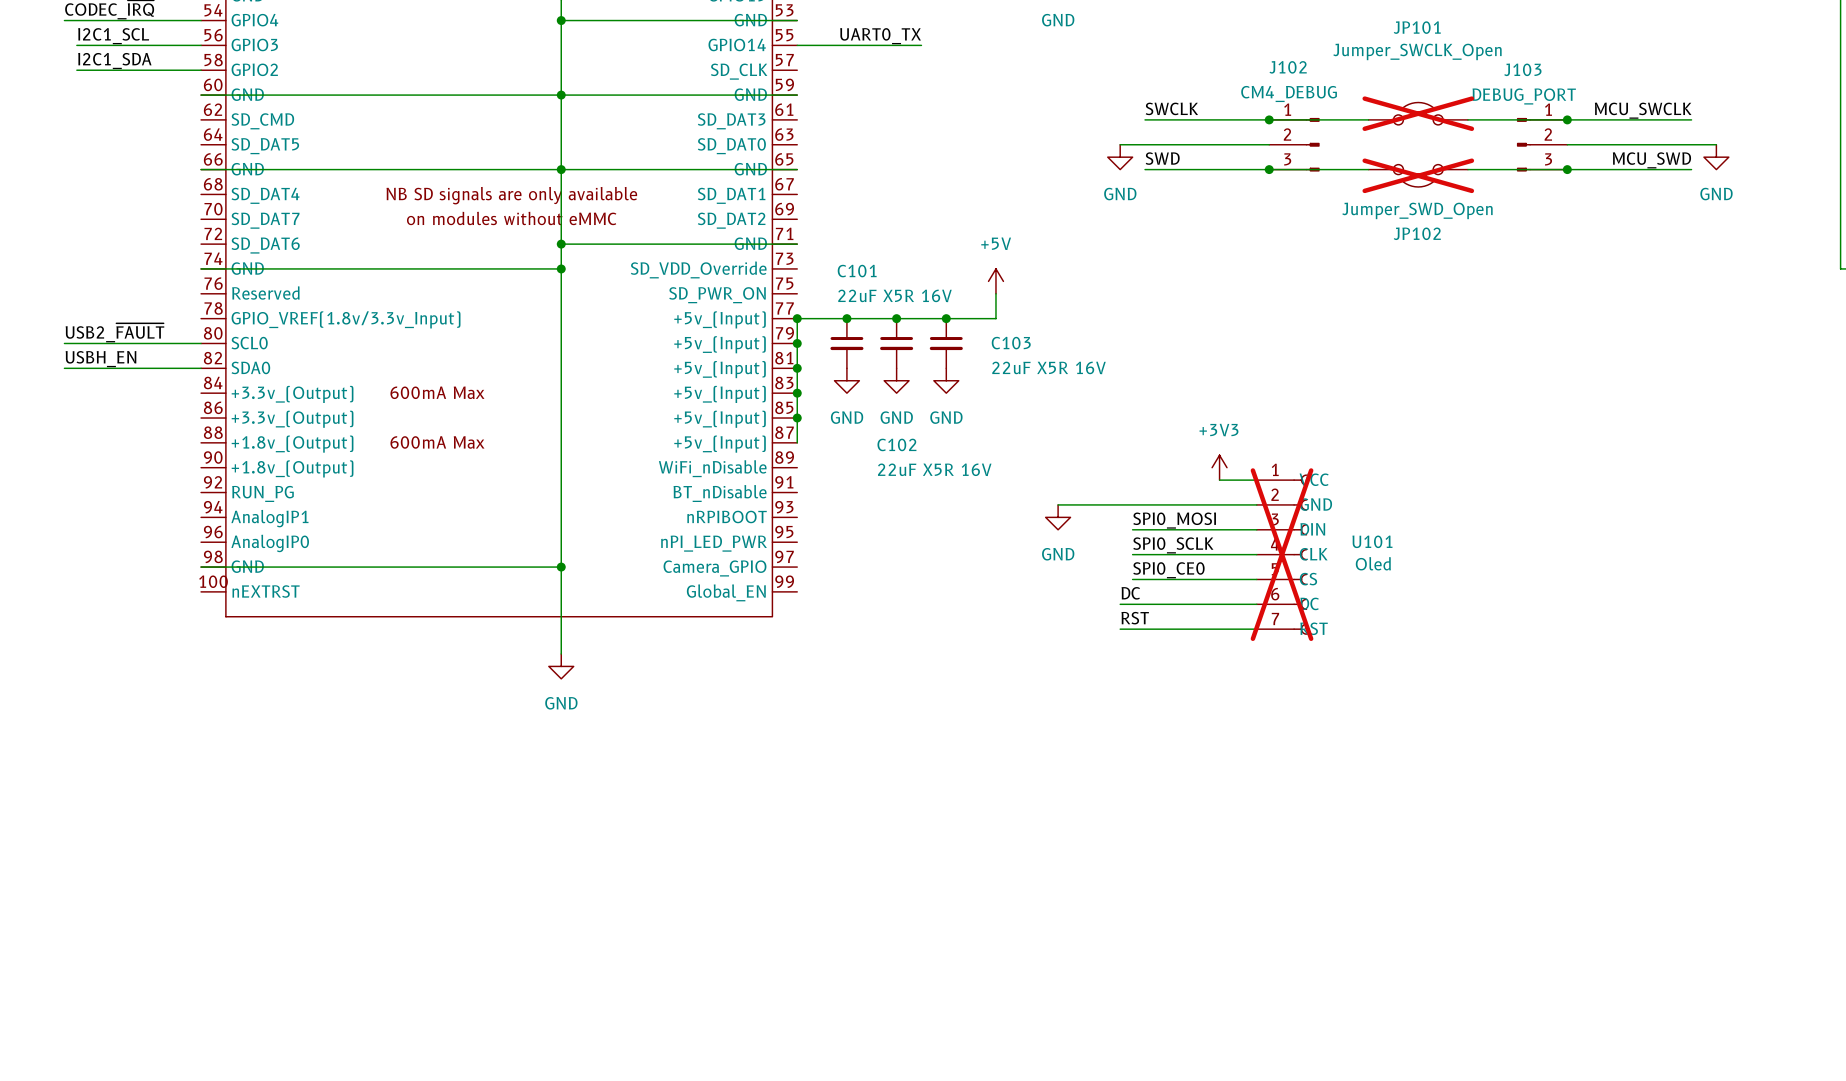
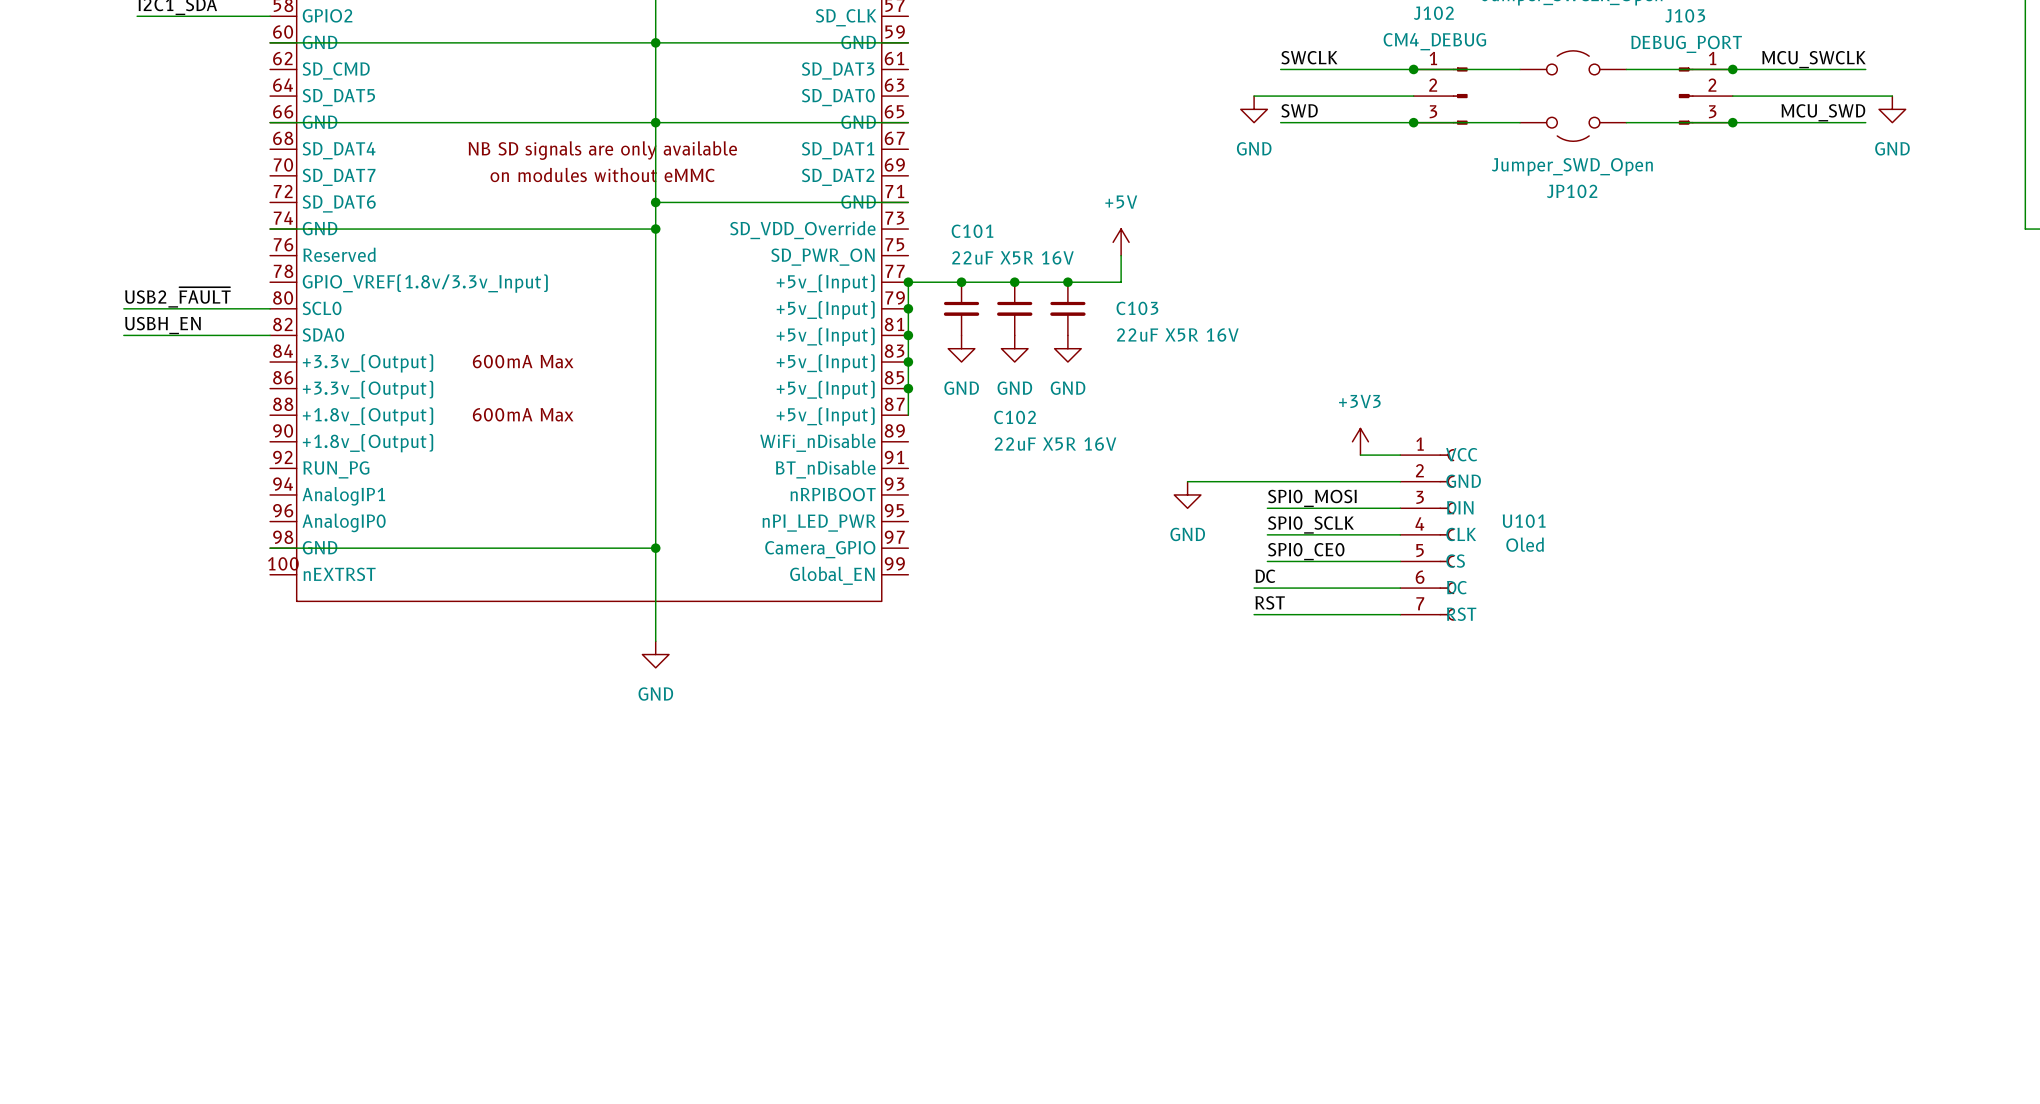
JP101 do-not-place cross: (1418, 113) -> none
JP102 do-not-place cross: (1418, 175) -> none
U101 do-not-place cross: (1282, 554) -> none

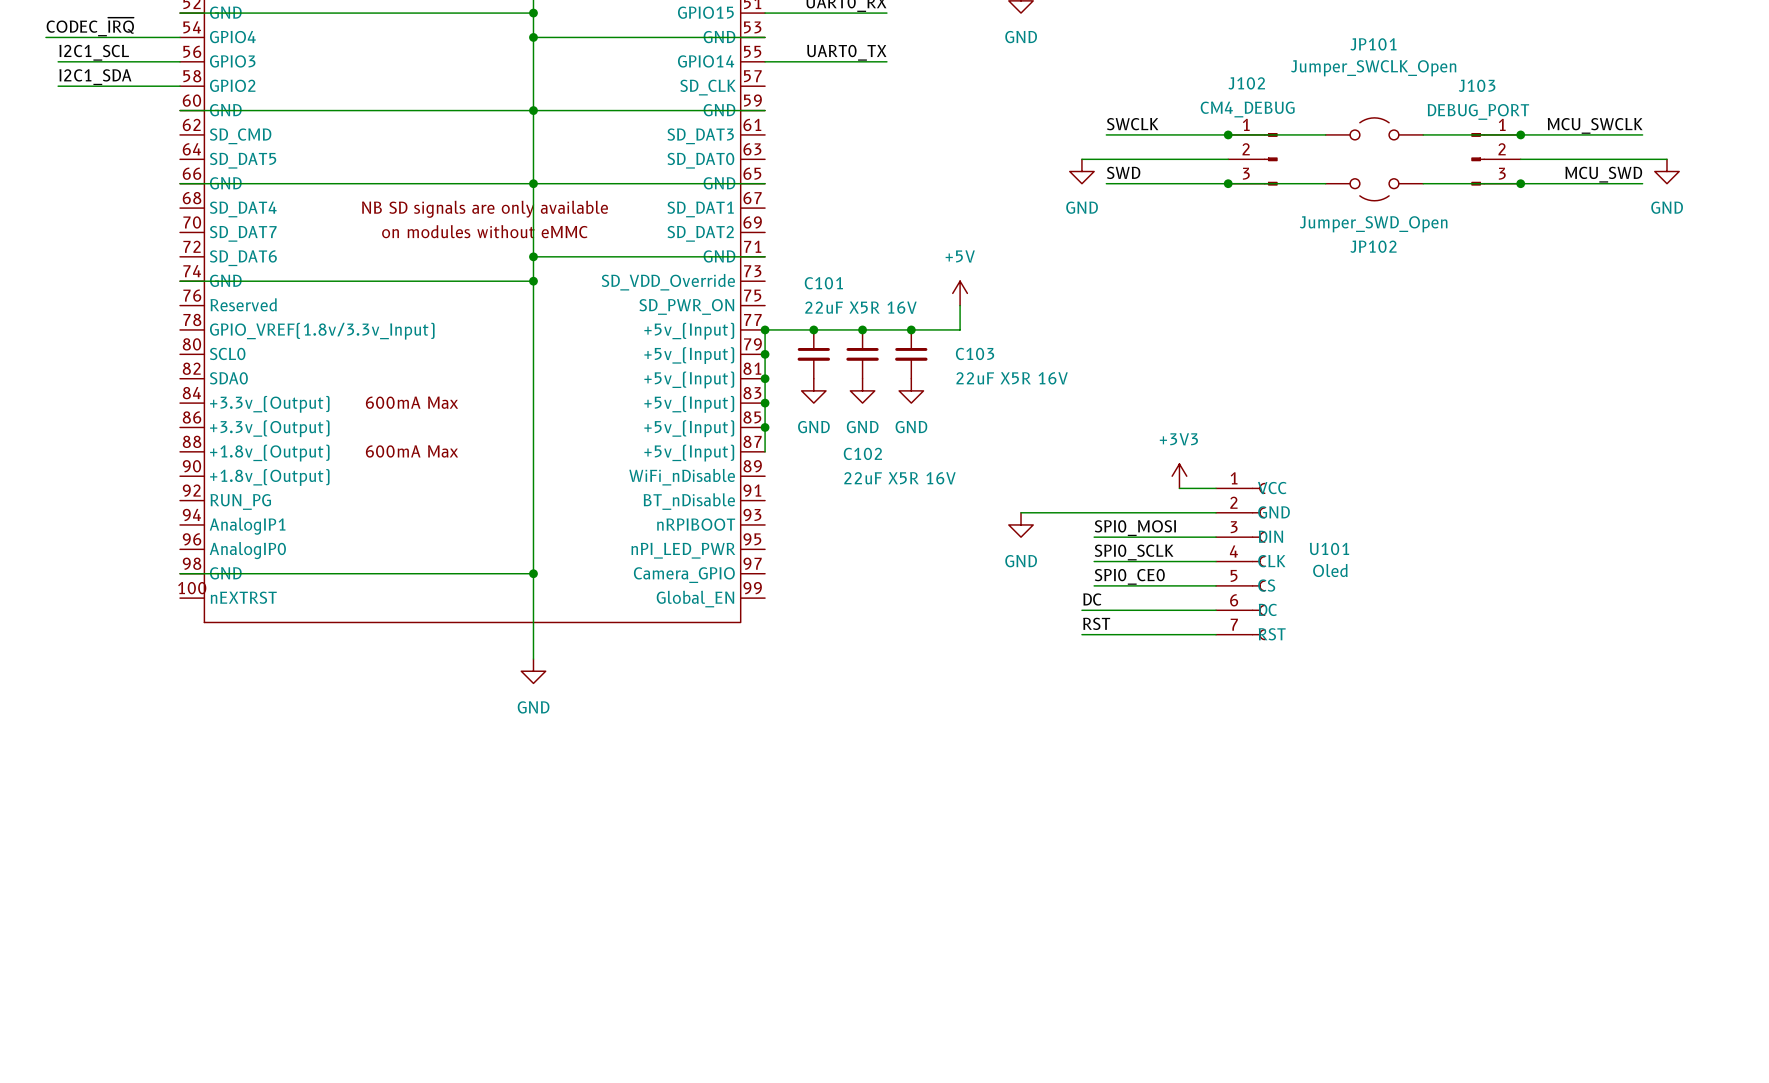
label: USB2_~{FAULT} (177, 297) -> none
wire: (123, 308) (270, 308) -> none
label: USBH_EN (162, 325) -> none
wire: (123, 335) (270, 335) -> none

